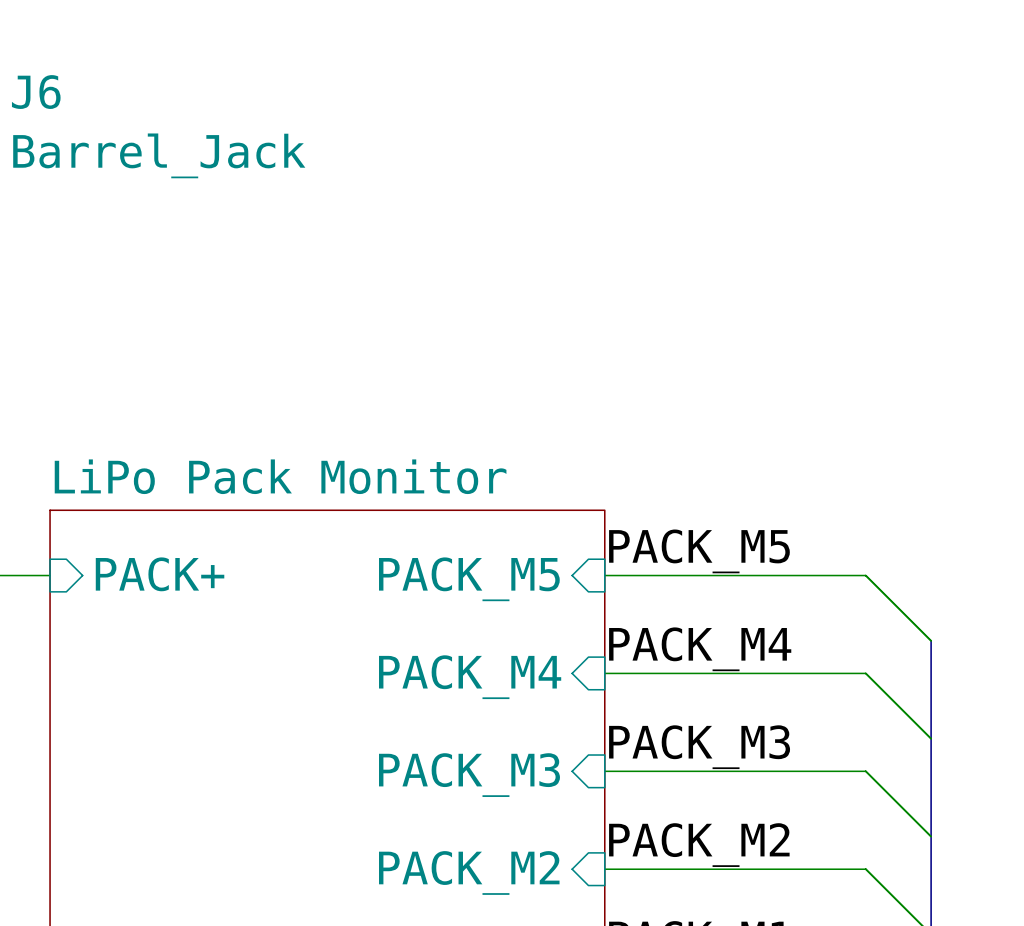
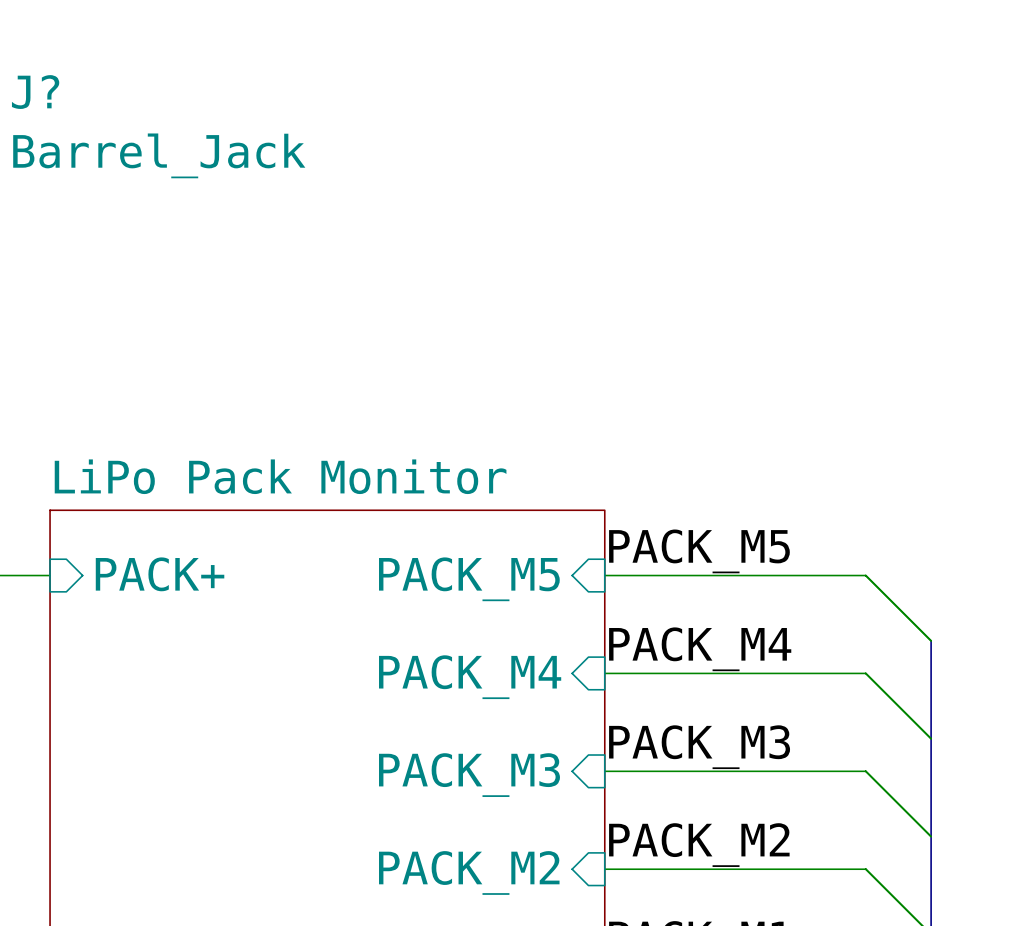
J6 name: J6 (36, 92) -> J? (35, 92)

